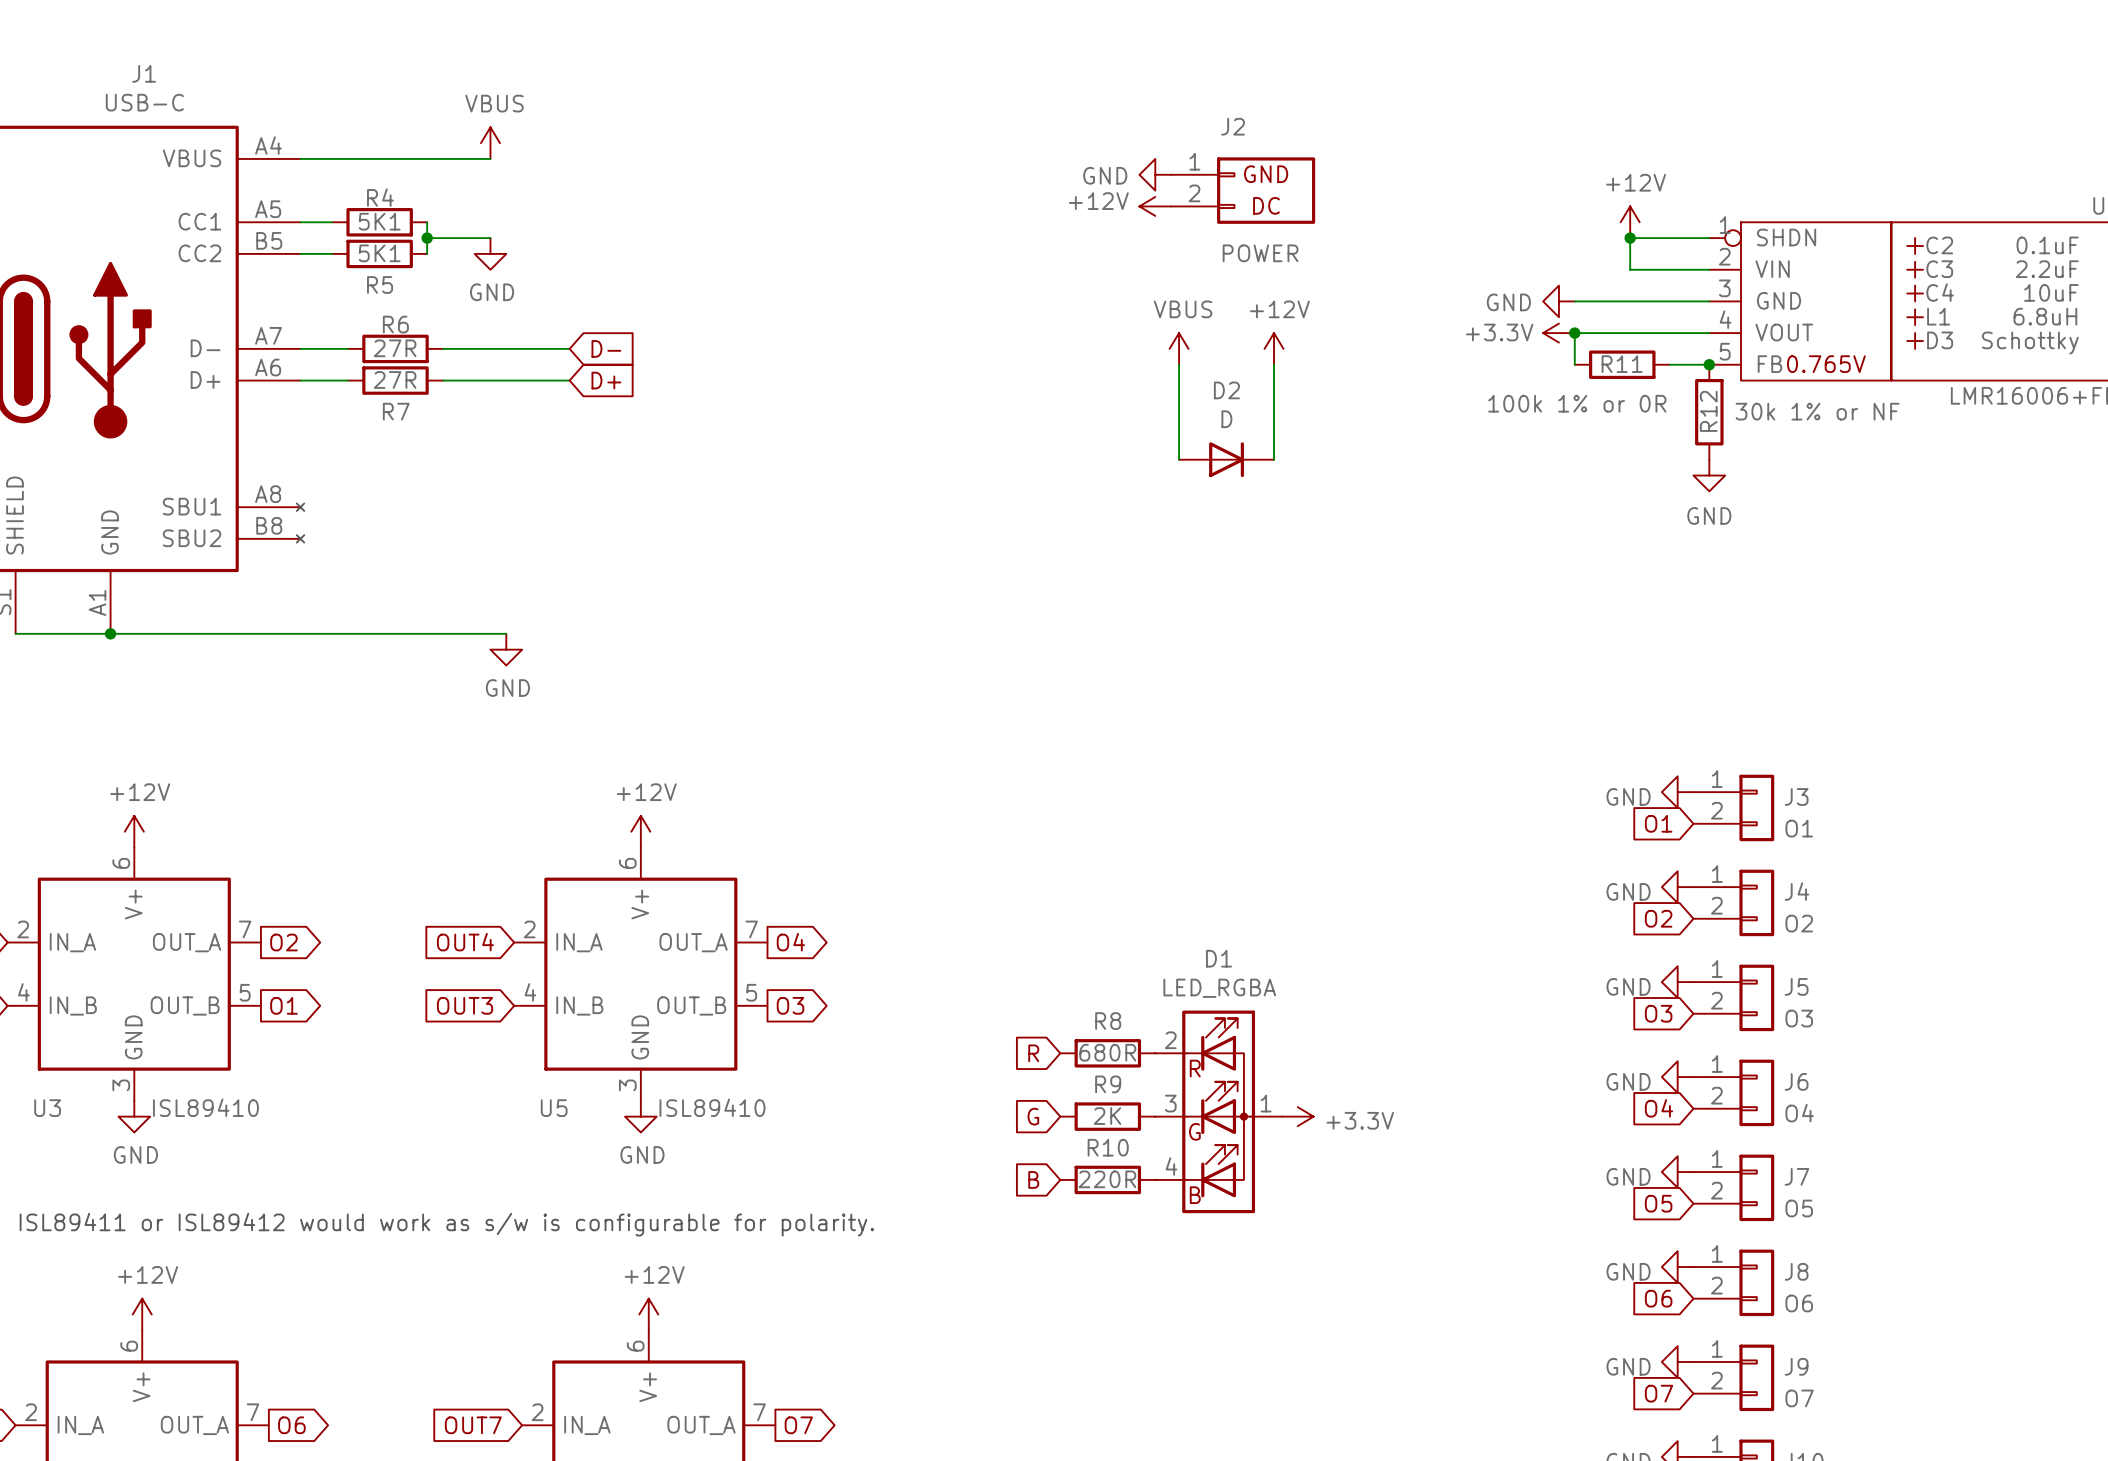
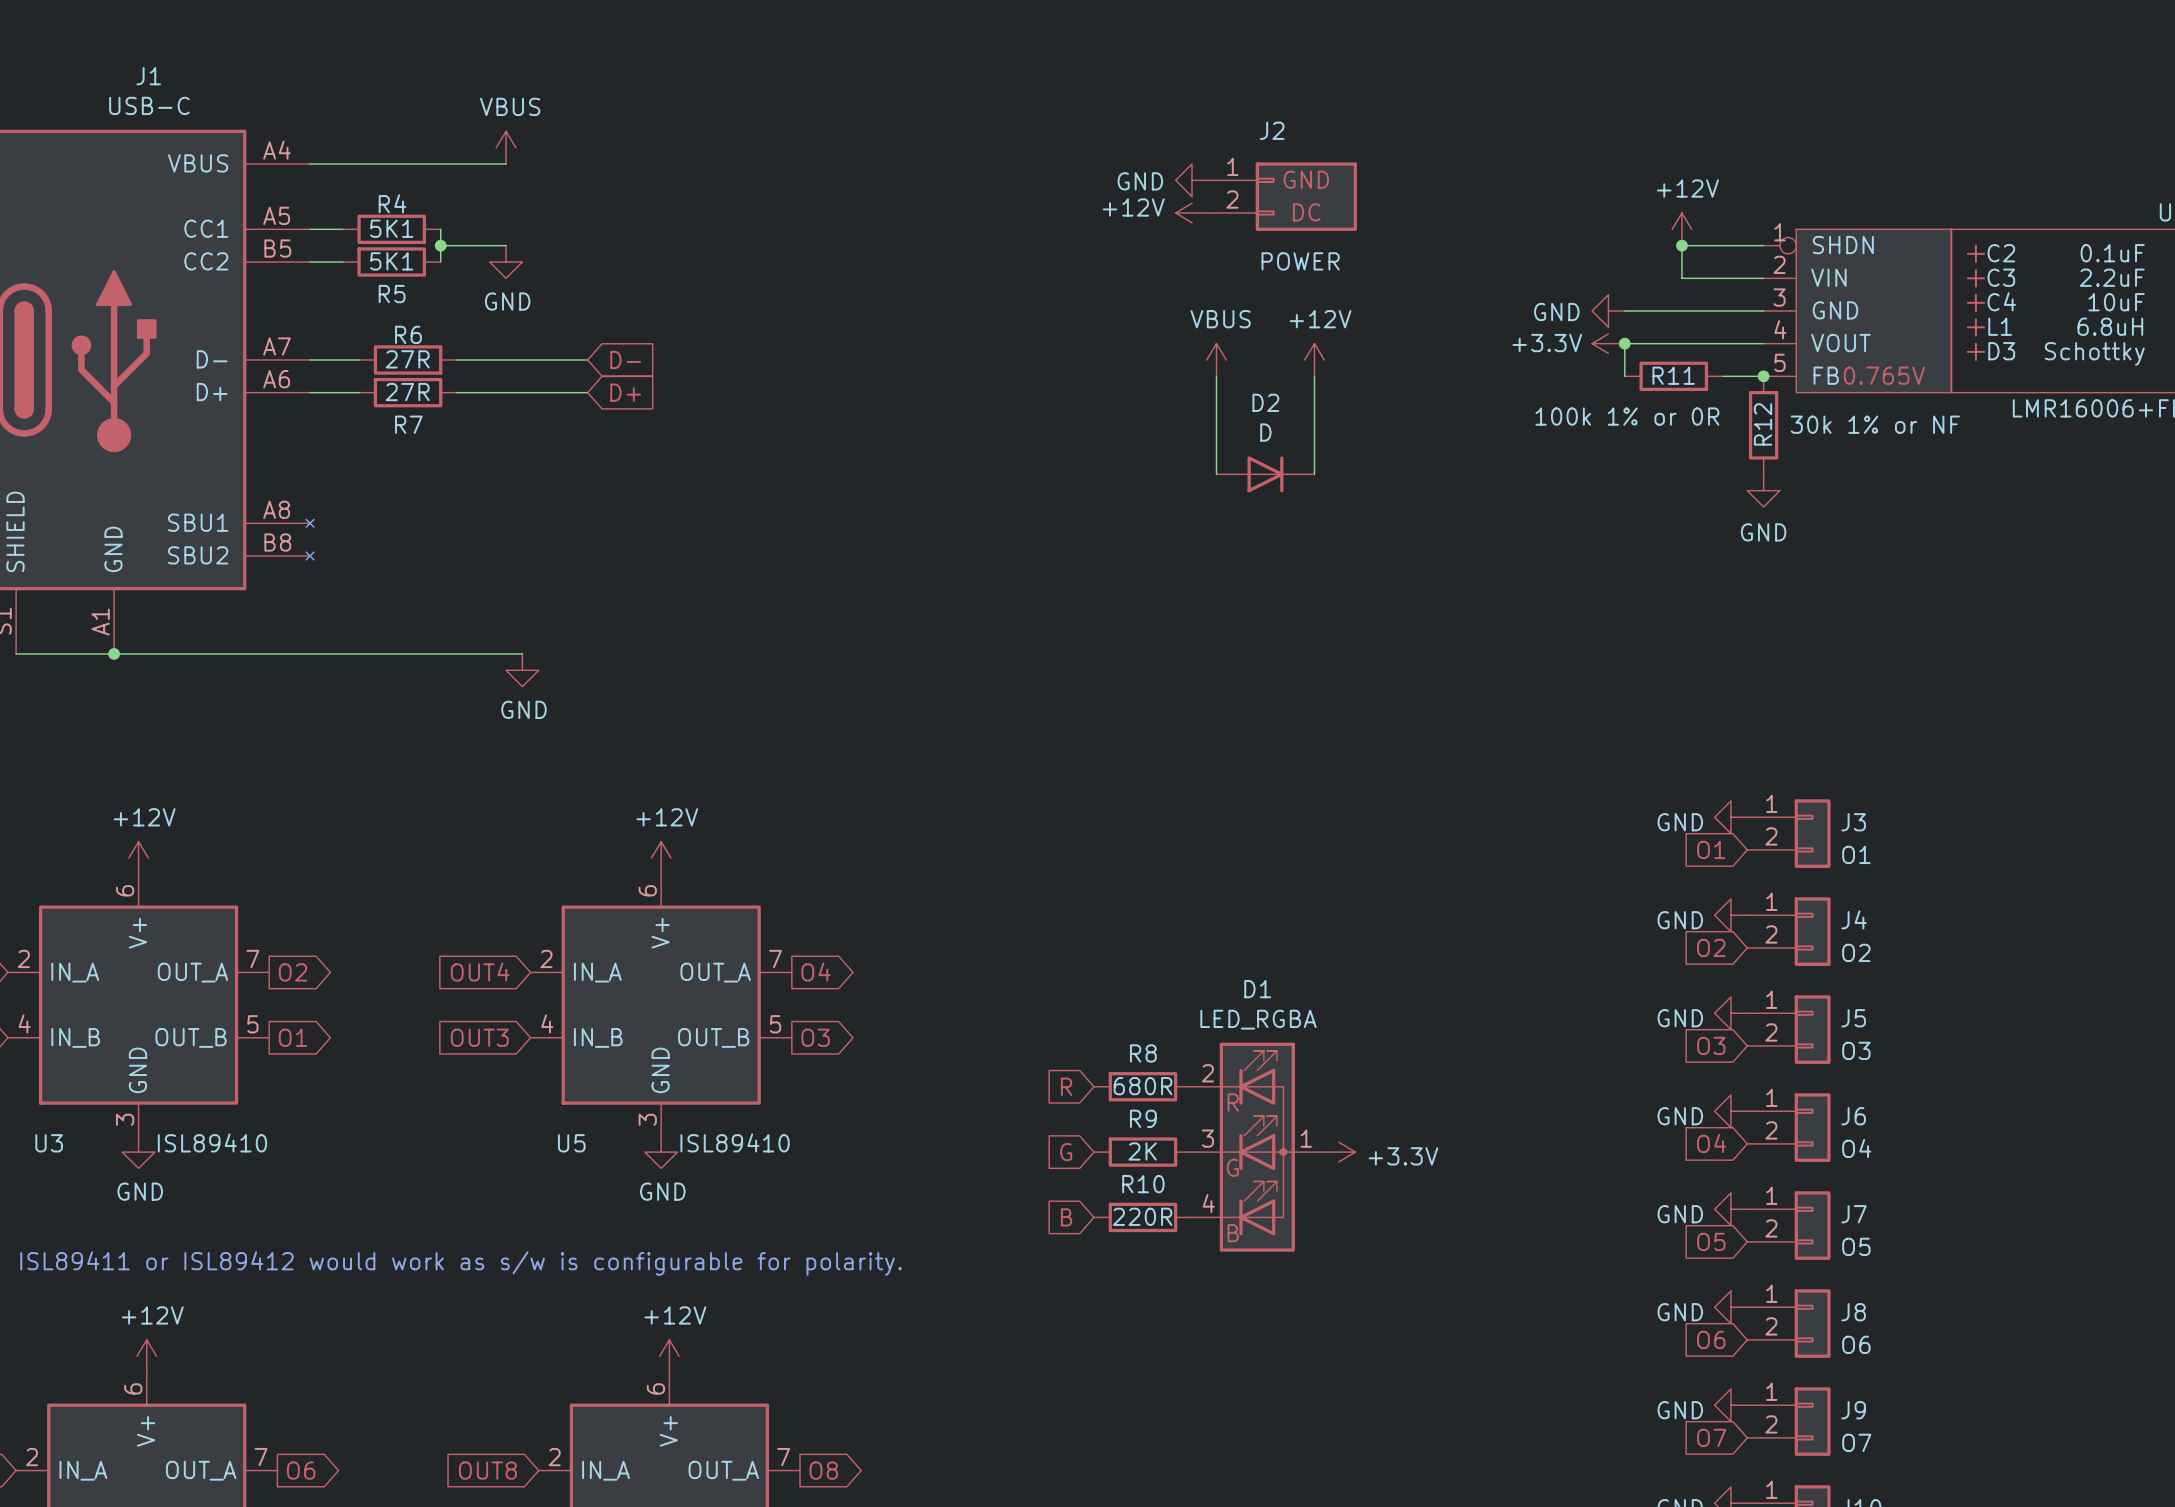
global label: OUT7 (473, 1425) -> OUT8 (487, 1470)
global label: O7 (798, 1425) -> O8 (823, 1470)

